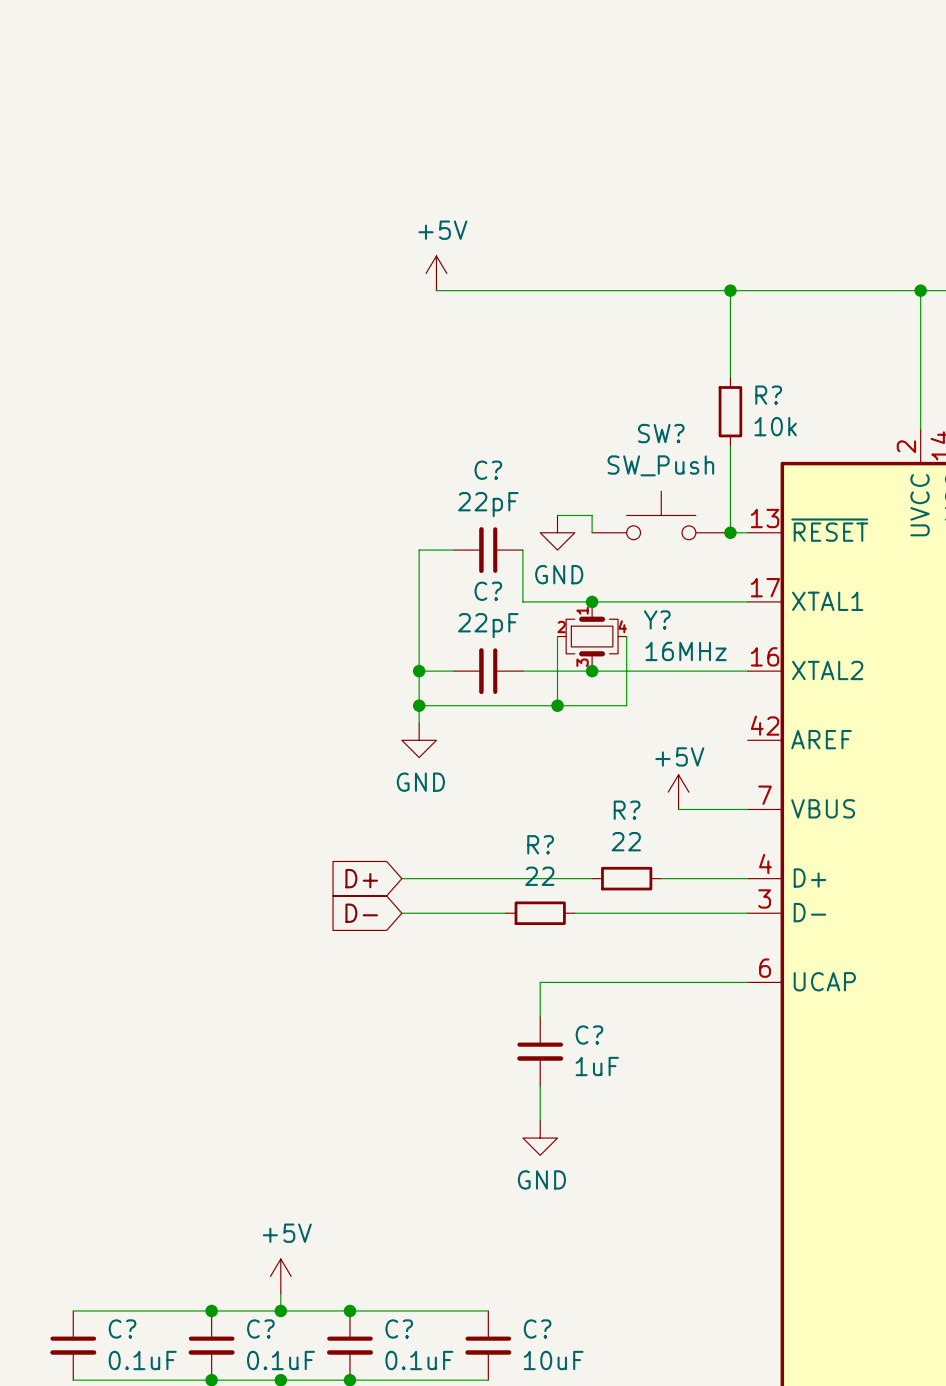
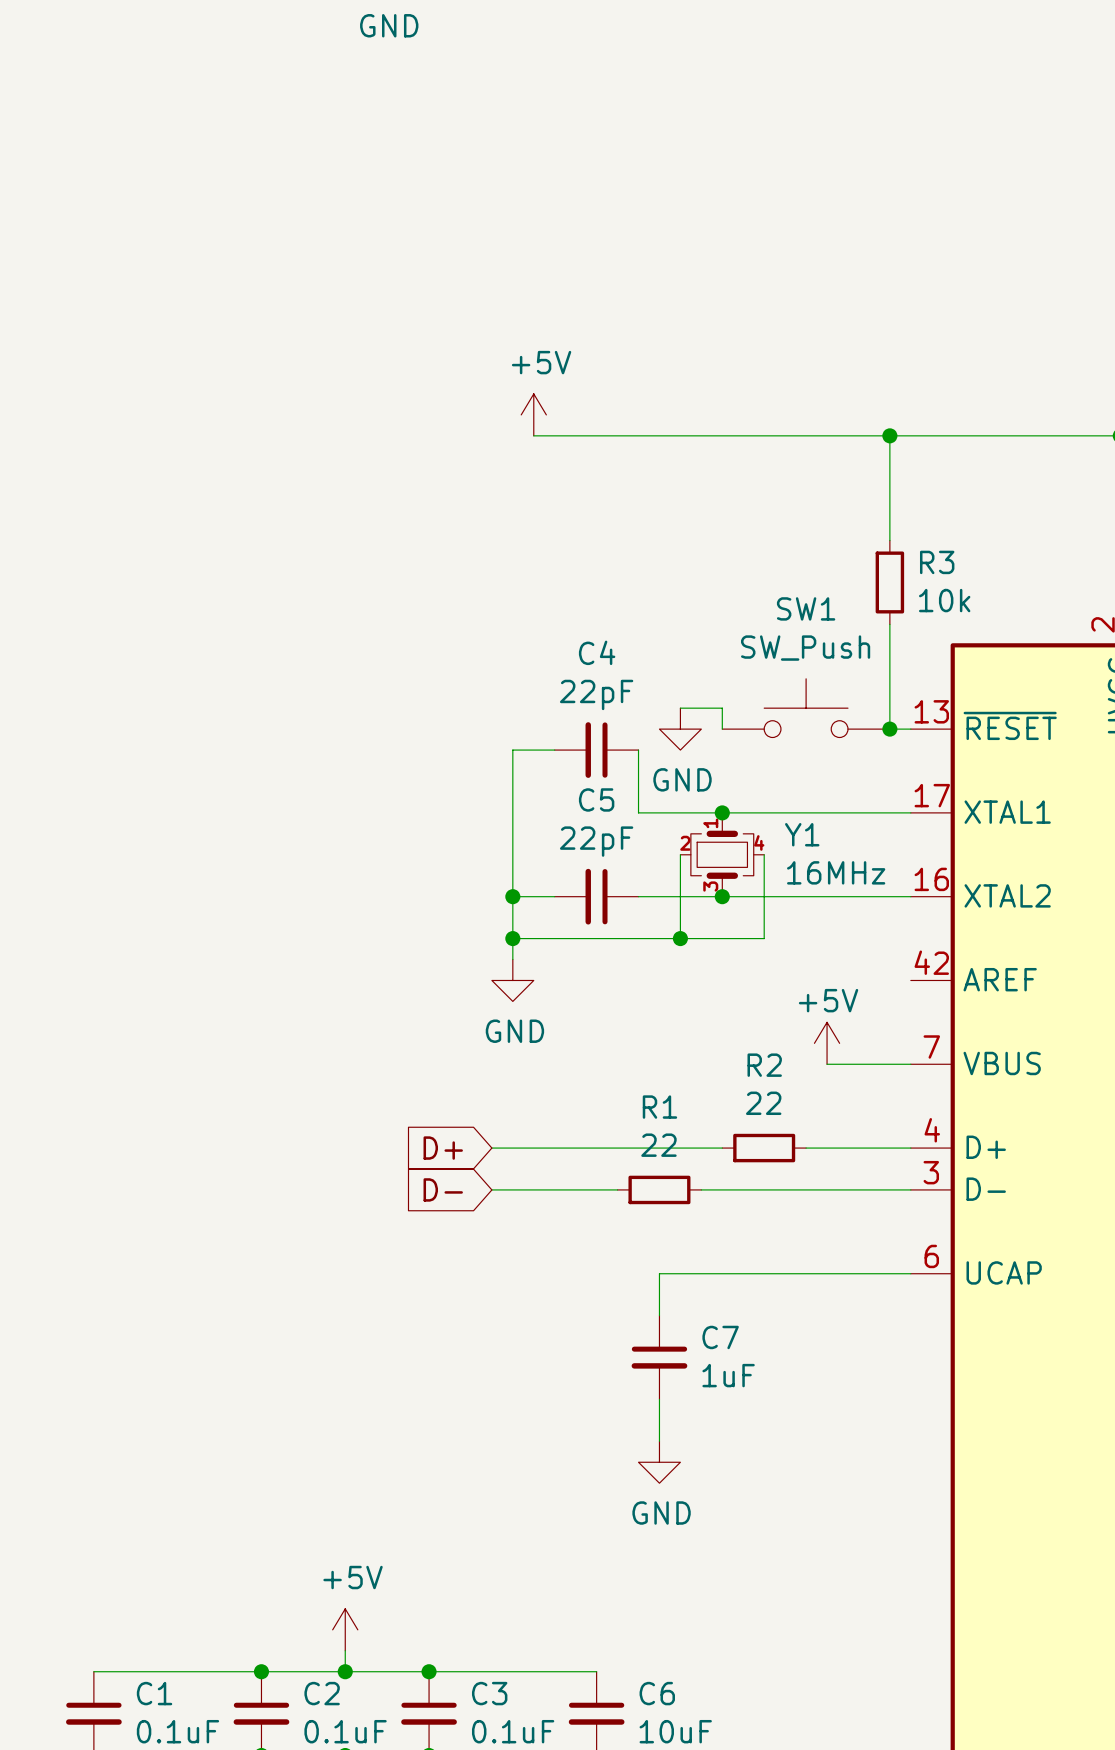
R? name: R? (768, 395) -> R3 (937, 562)
SW? name: SW? (661, 433) -> SW1 (806, 608)
C? name: C? (488, 470) -> C4 (597, 652)
C? name: C? (488, 591) -> C5 (596, 799)
Y? name: Y? (657, 619) -> Y1 (802, 834)
R? name: R? (627, 810) -> R2 (764, 1065)
R? name: R? (540, 844) -> R1 (659, 1107)
C? name: C? (589, 1035) -> C7 (720, 1337)
C? name: C? (122, 1329) -> C1 (154, 1693)
C? name: C? (260, 1329) -> C2 (322, 1693)
C? name: C? (399, 1329) -> C3 (489, 1693)
C? name: C? (537, 1329) -> C6 (657, 1693)

